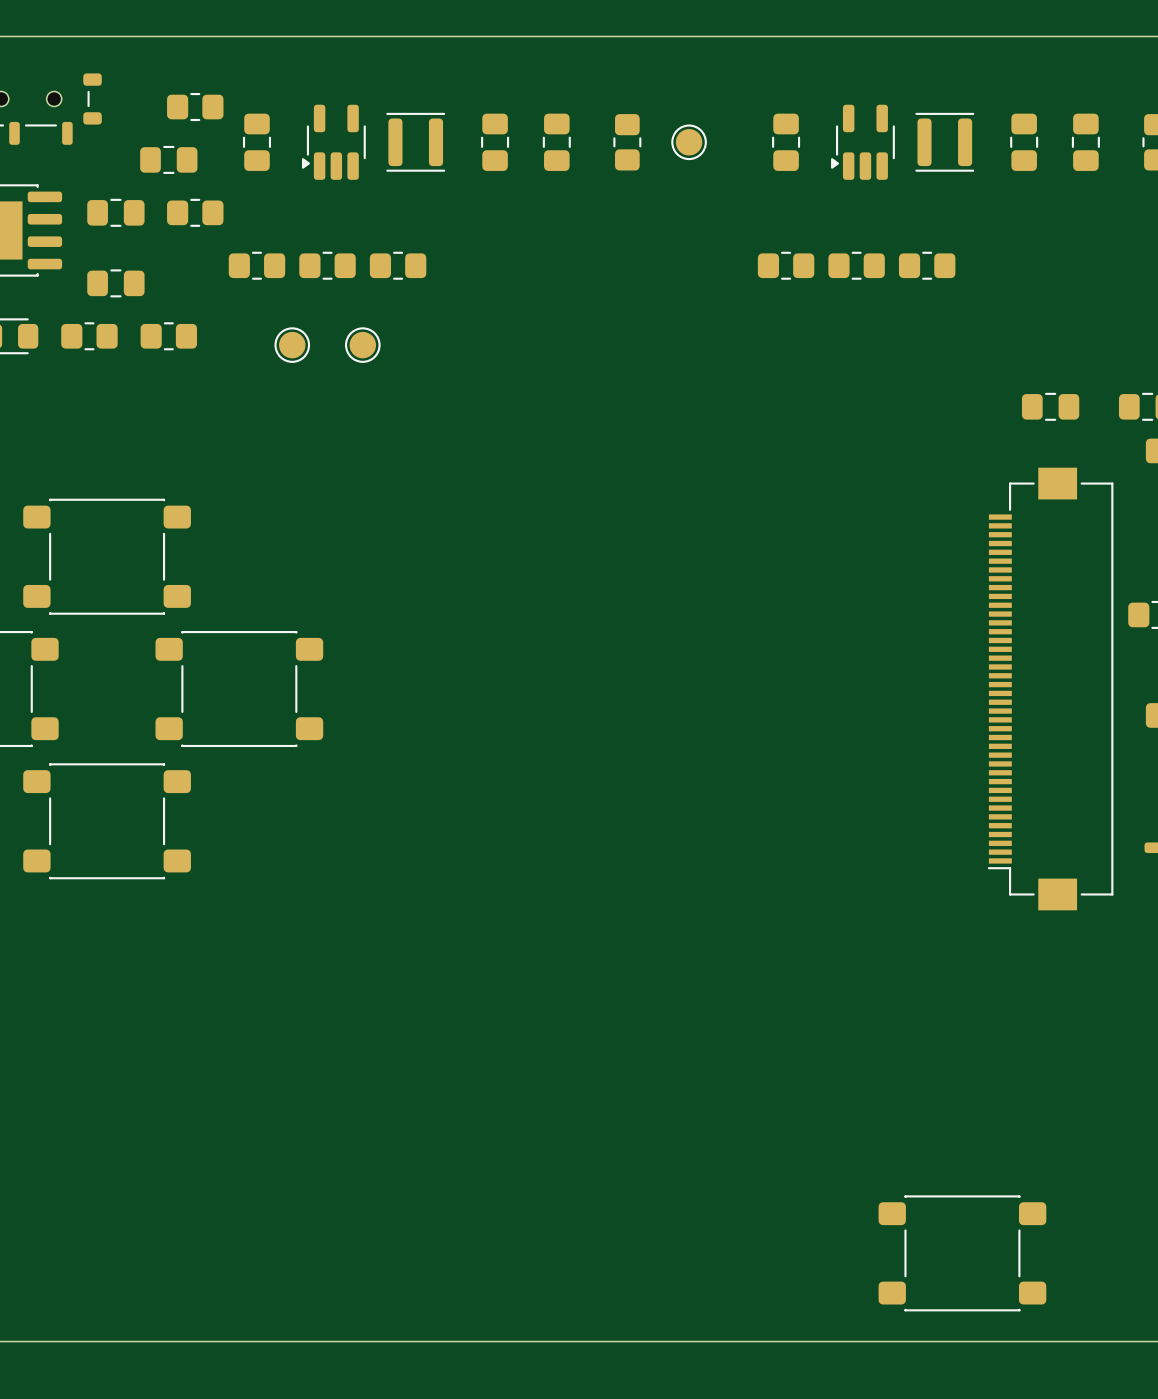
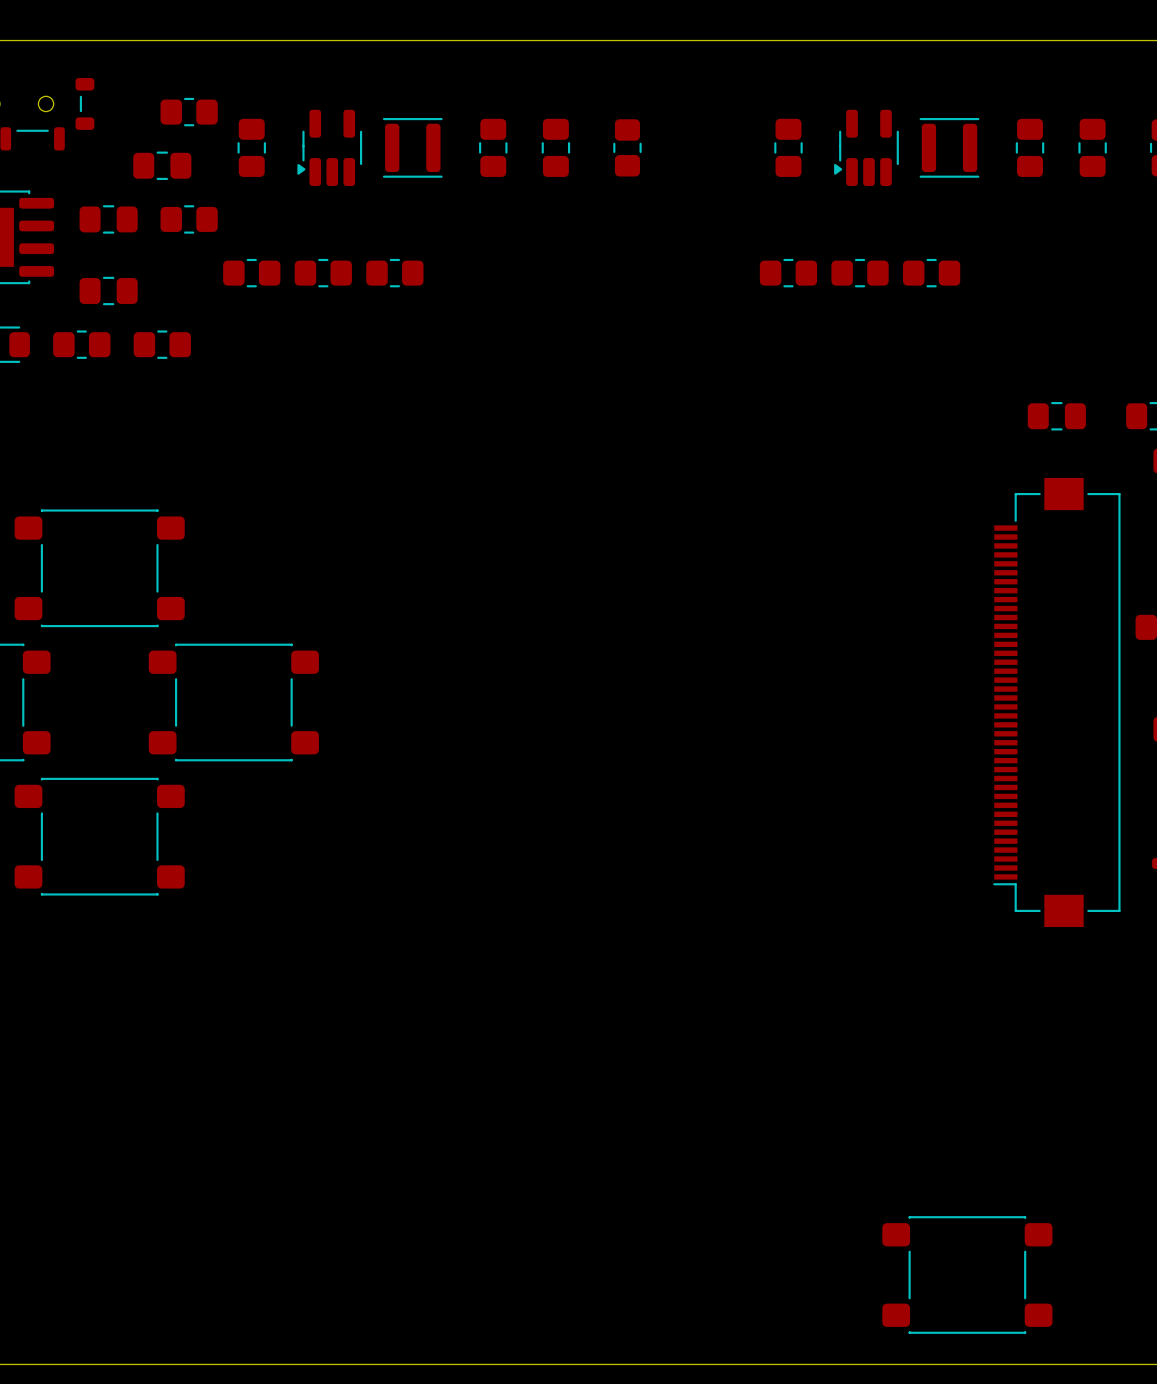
part: (689, 142) -> none
part: (292, 345) -> none
part: (362, 345) -> none

